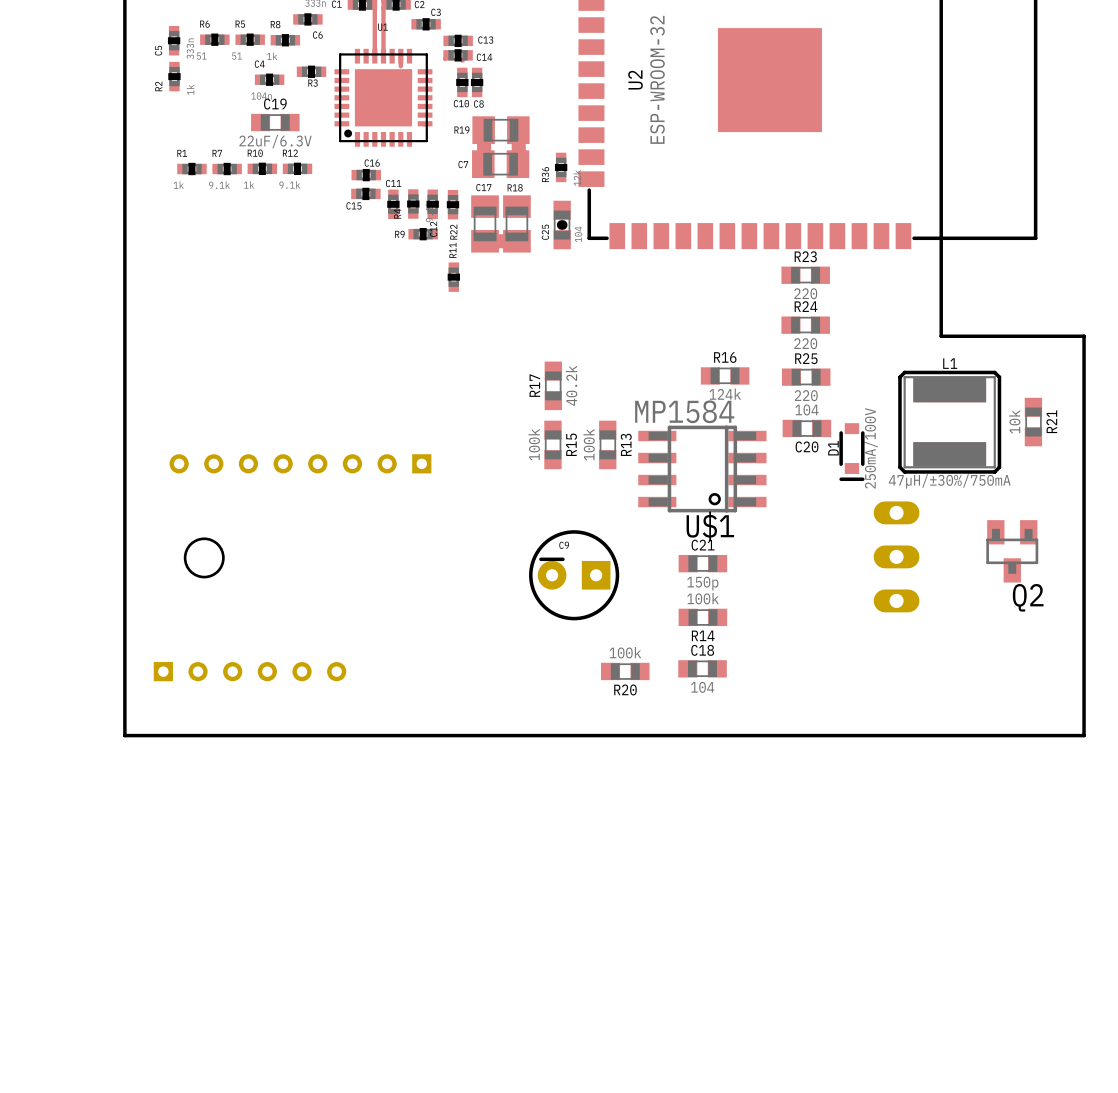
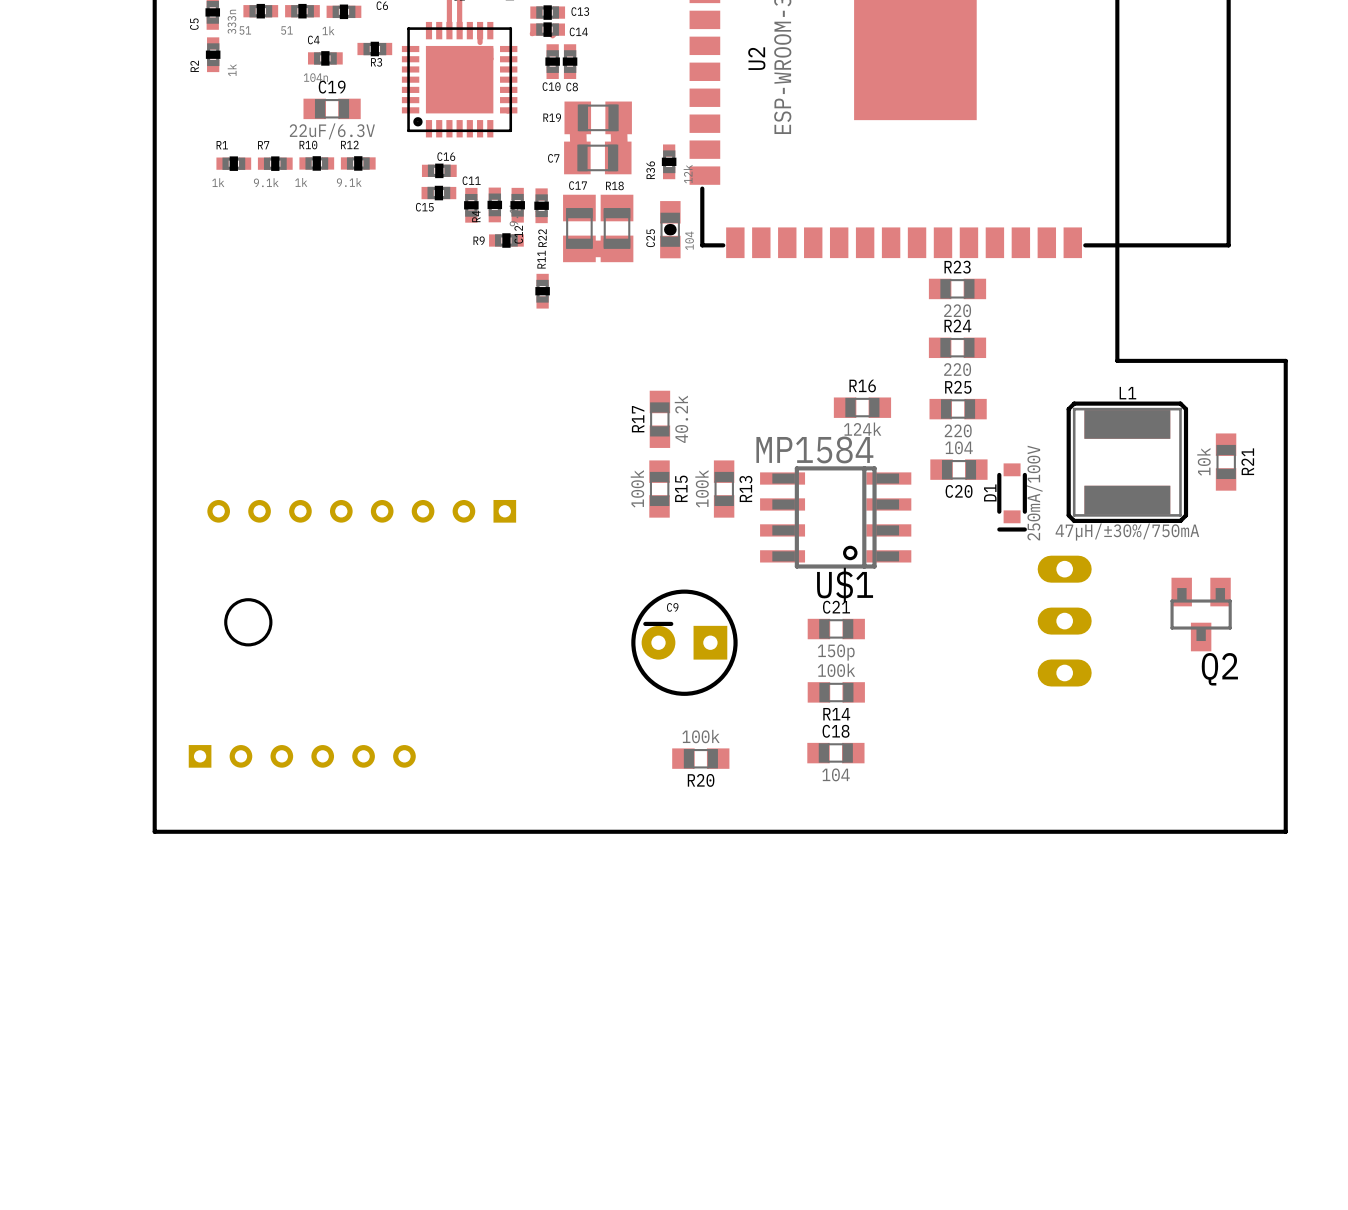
R20 position: (625, 671) -> (700, 758)

